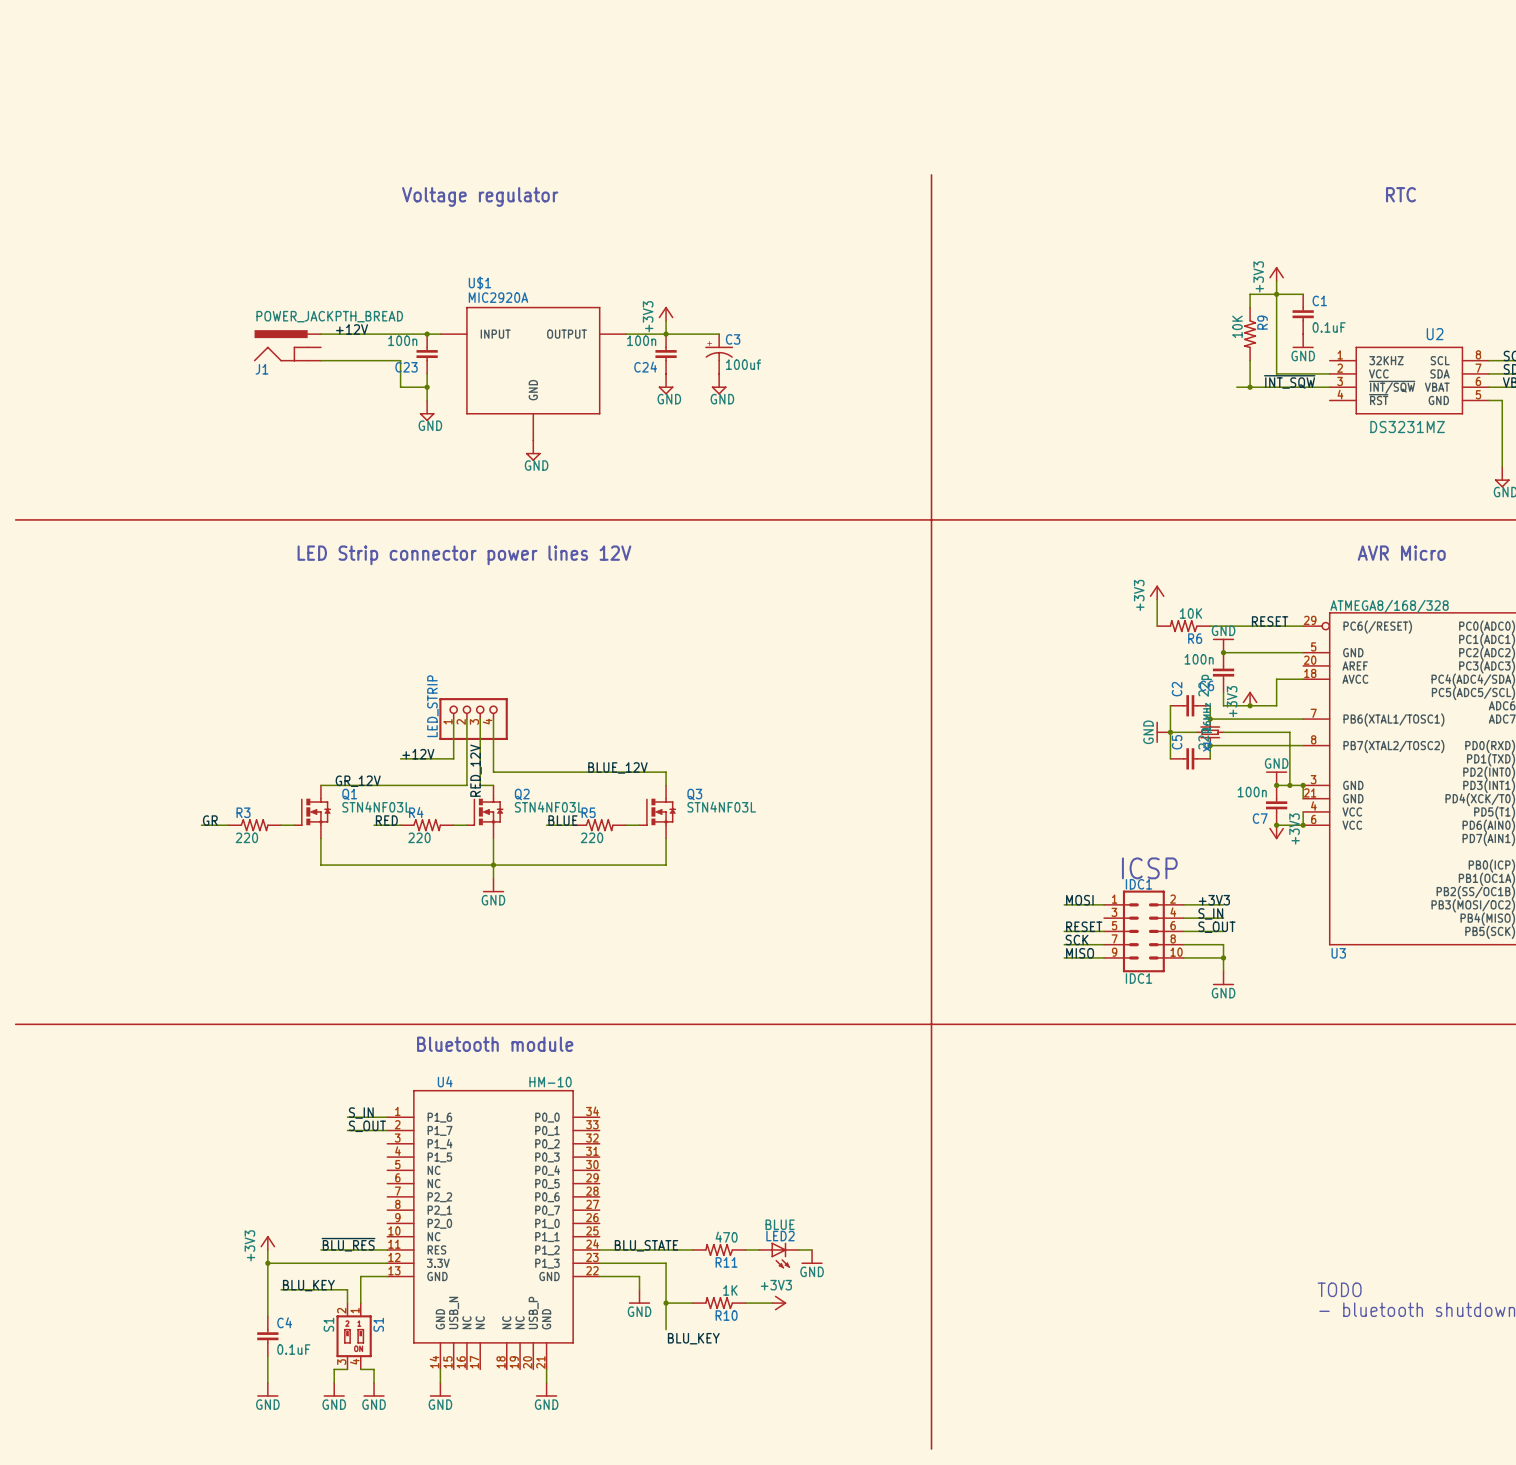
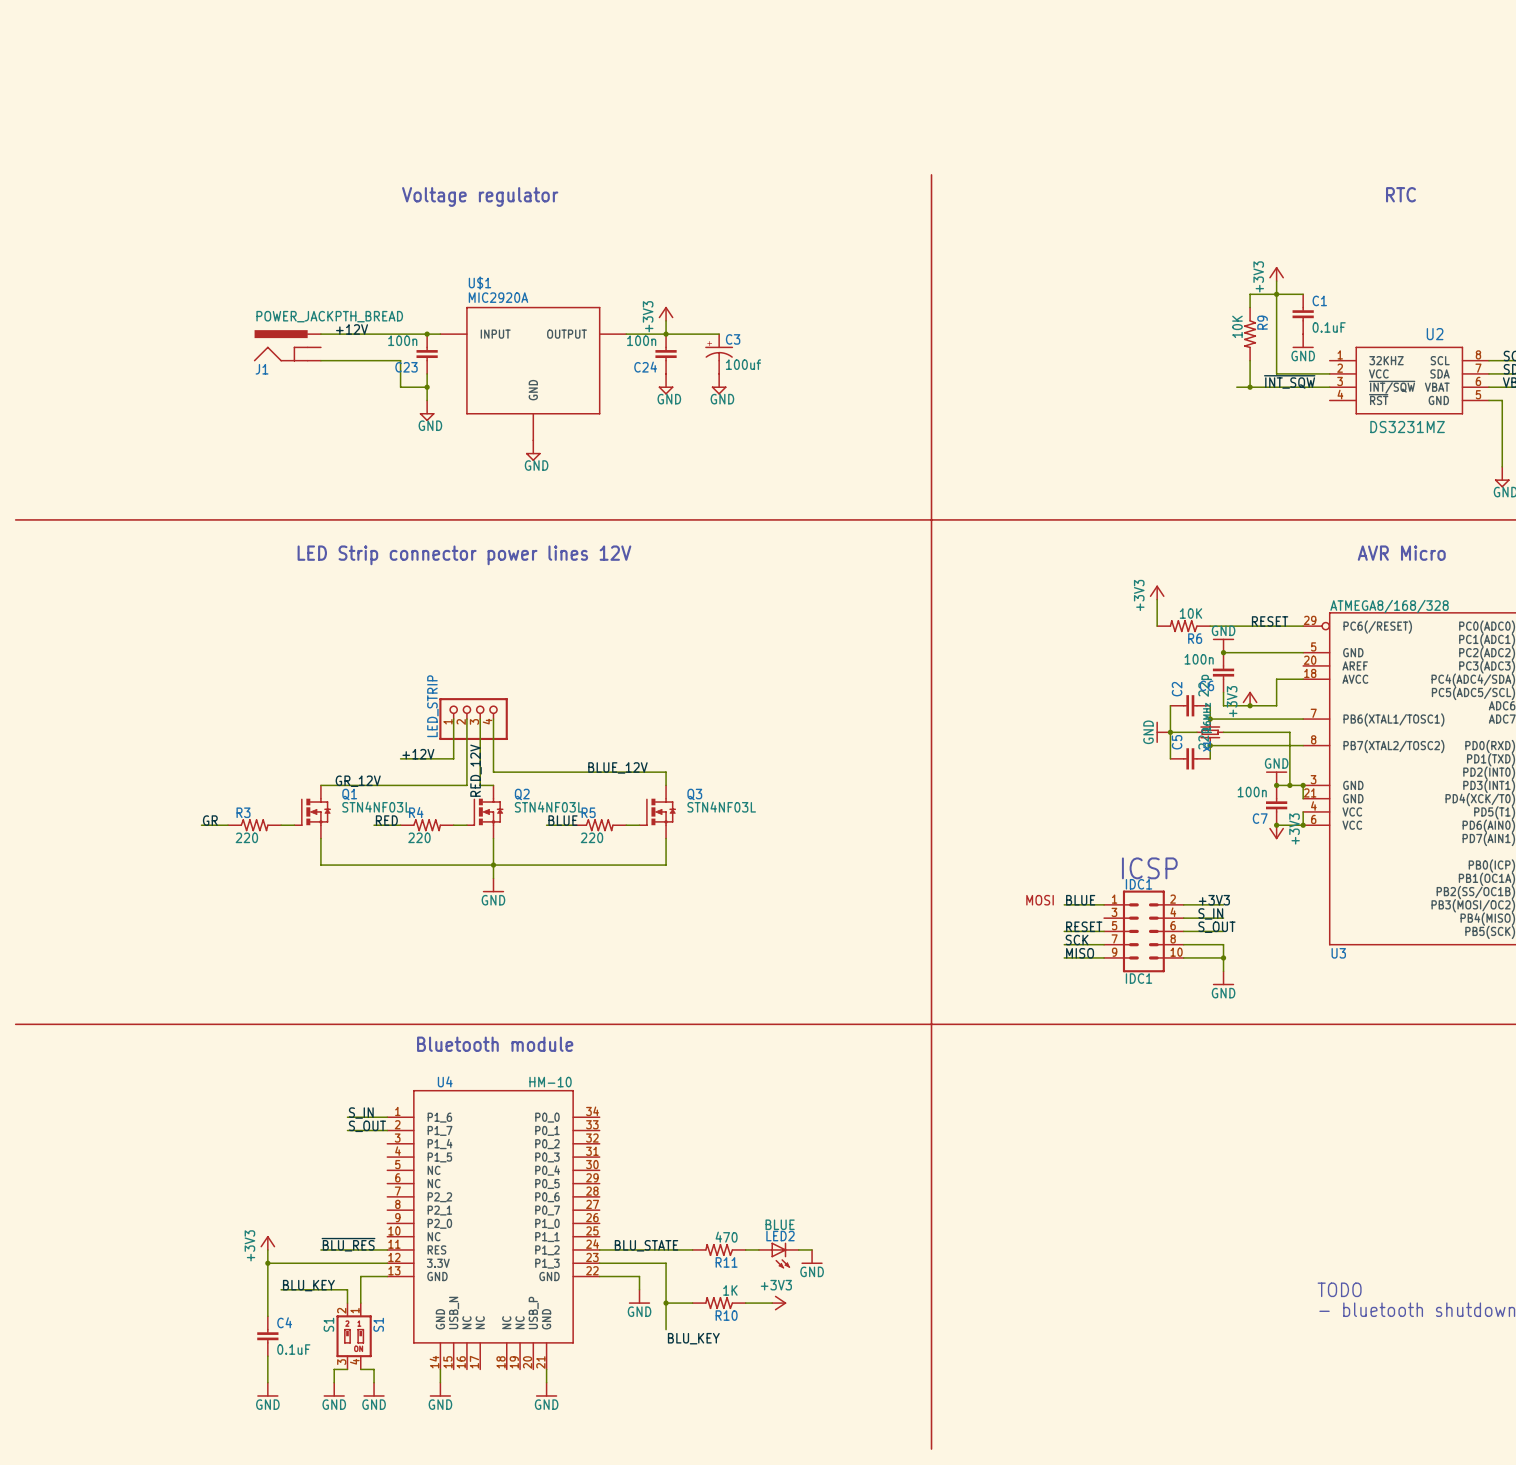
text: none -> MOSI (1040, 900)
label: MOSI (1079, 900) -> BLUE (1080, 900)

